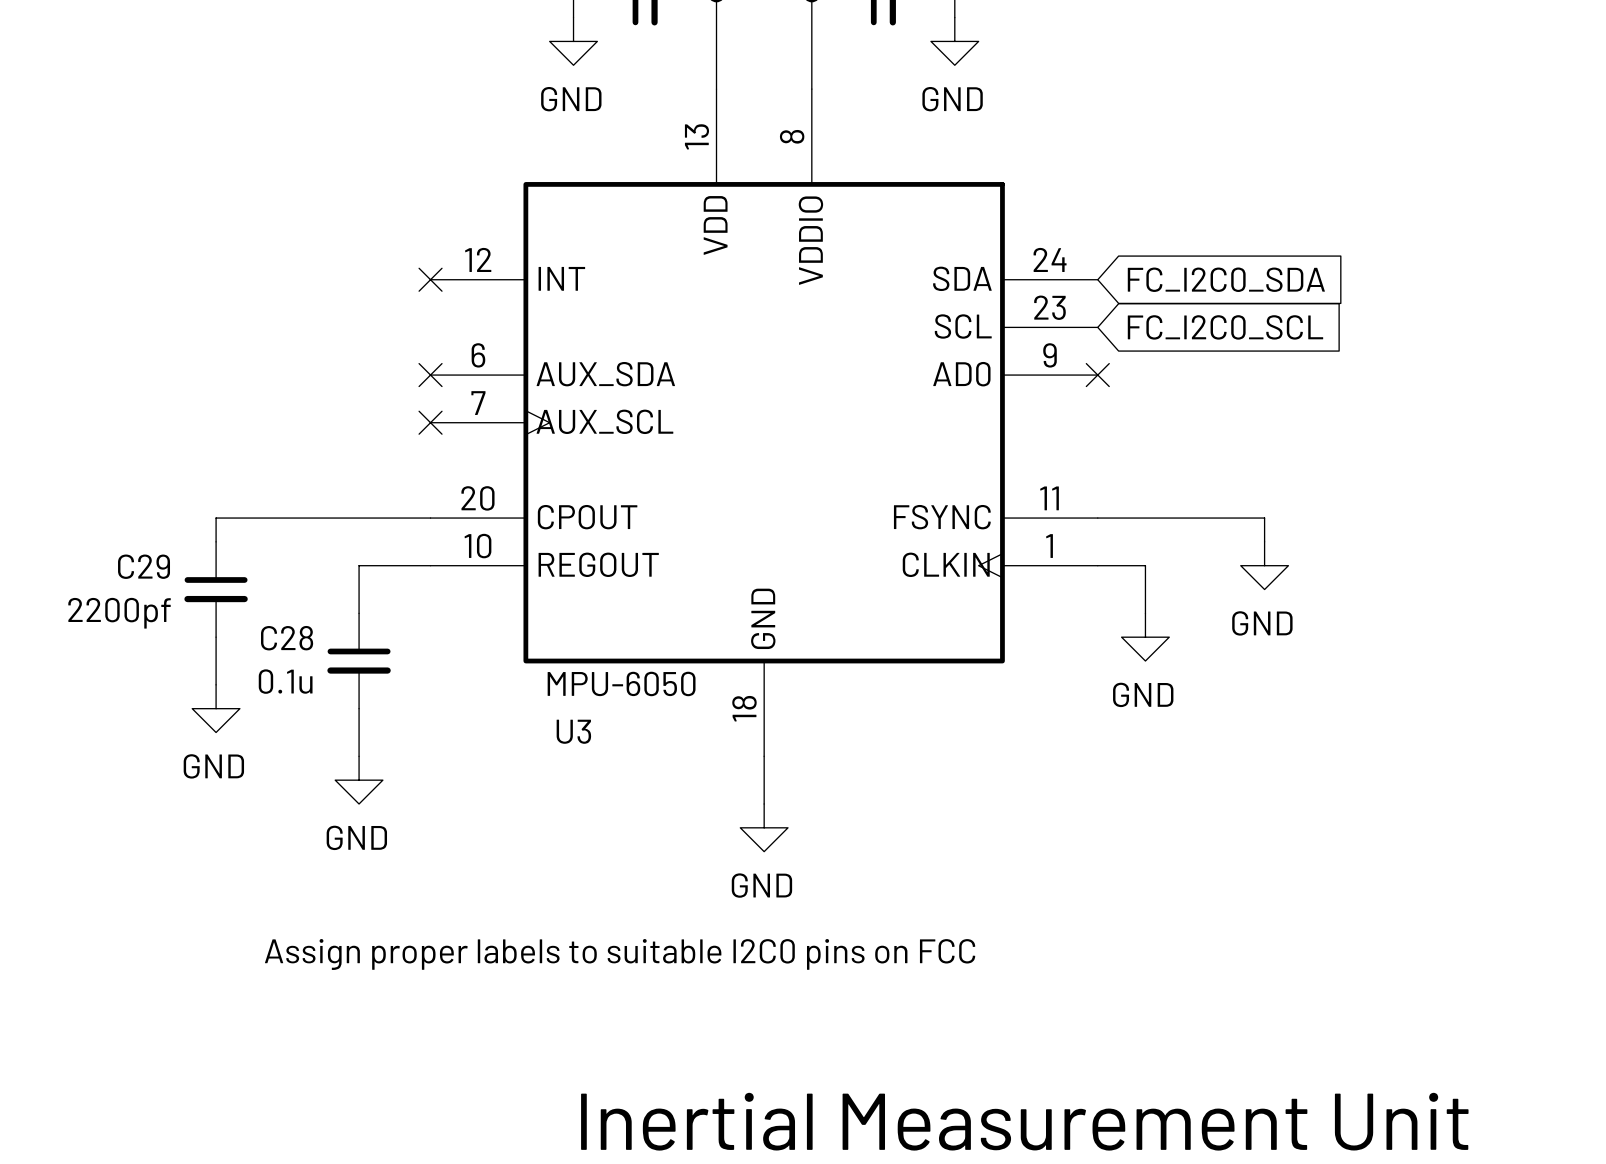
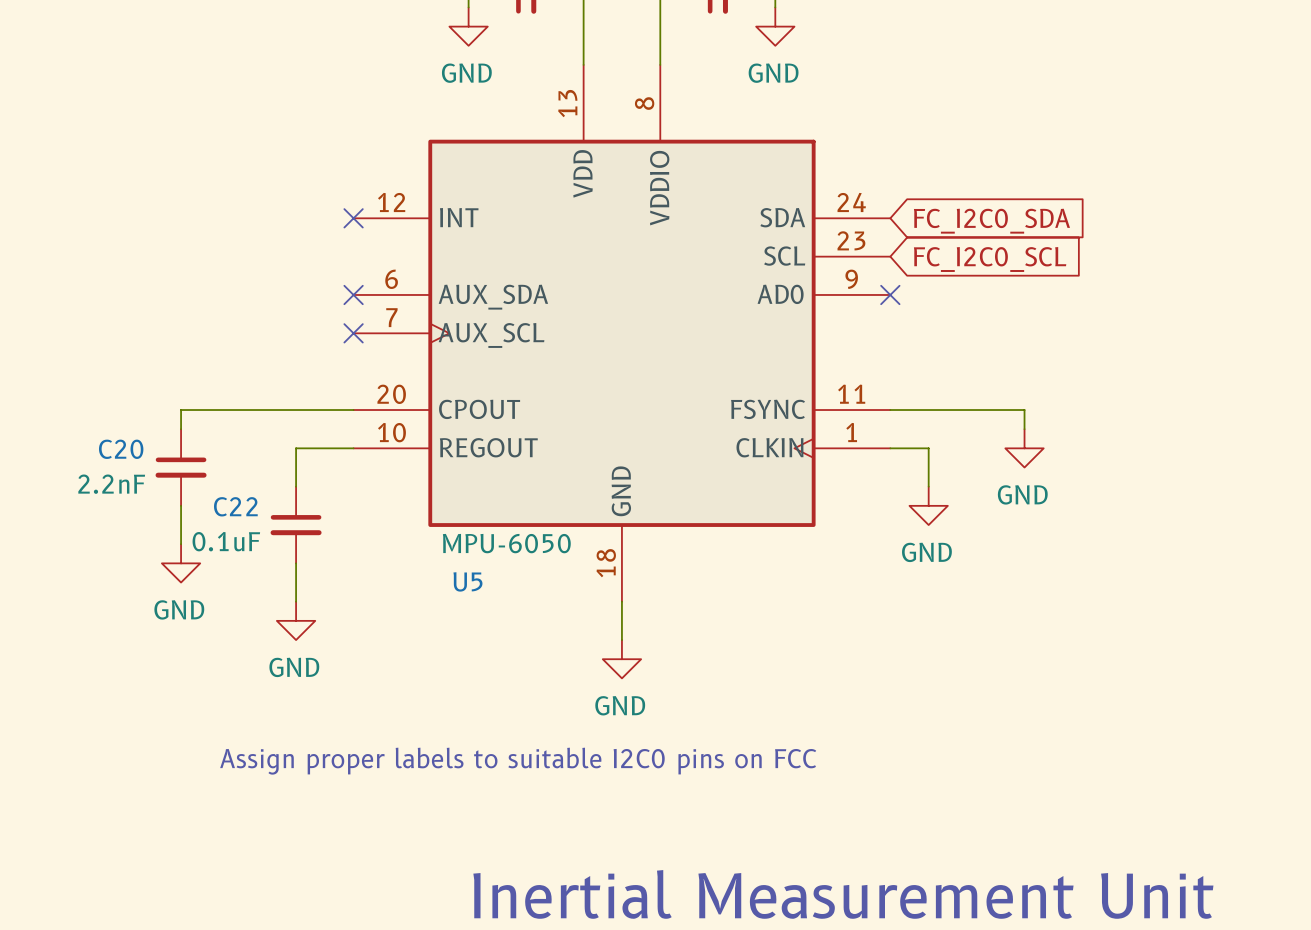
C29 name: C29 (144, 566) -> C20 (121, 449)
C29 value: 2200pf (119, 613) -> 2.2nF (111, 484)
C28 name: C28 (287, 638) -> C22 (235, 506)
C28 value: 0.1u (285, 681) -> 0.1uF (226, 541)
U3 name: U3 (573, 731) -> U5 (467, 581)

